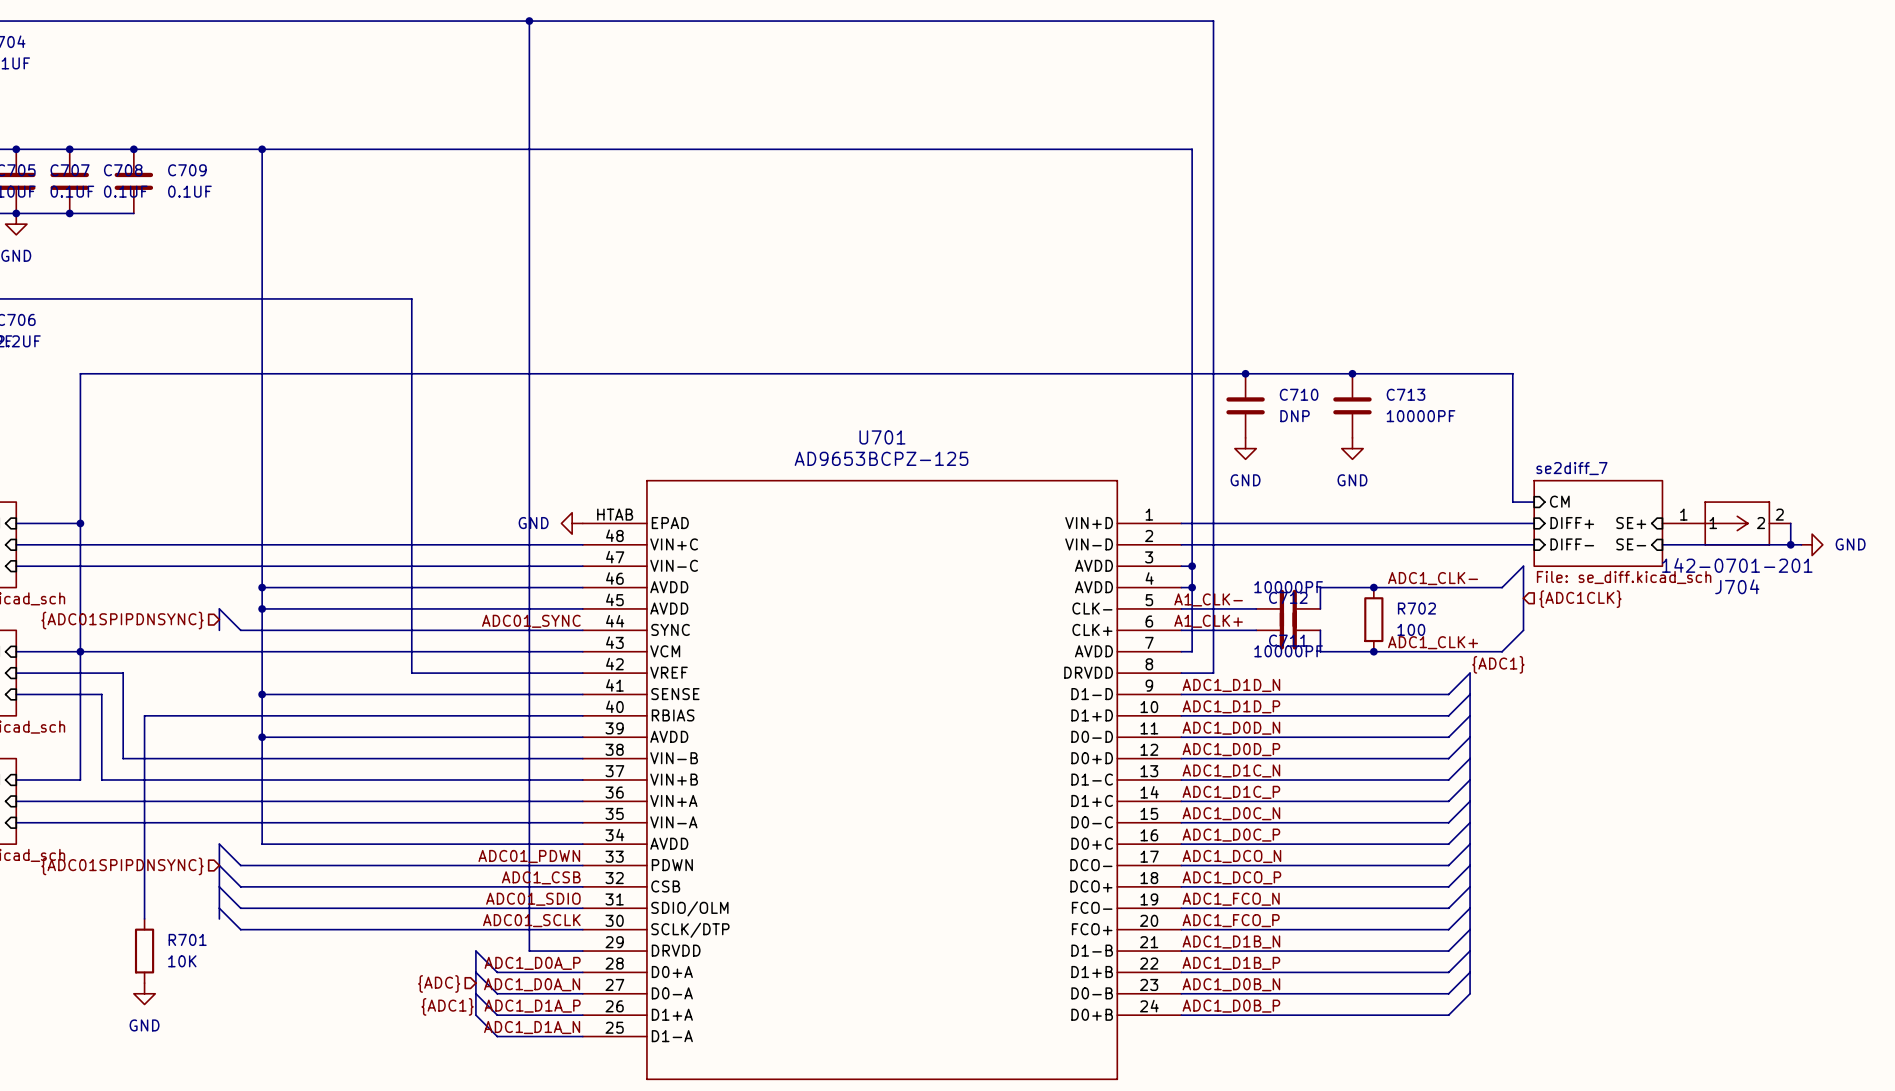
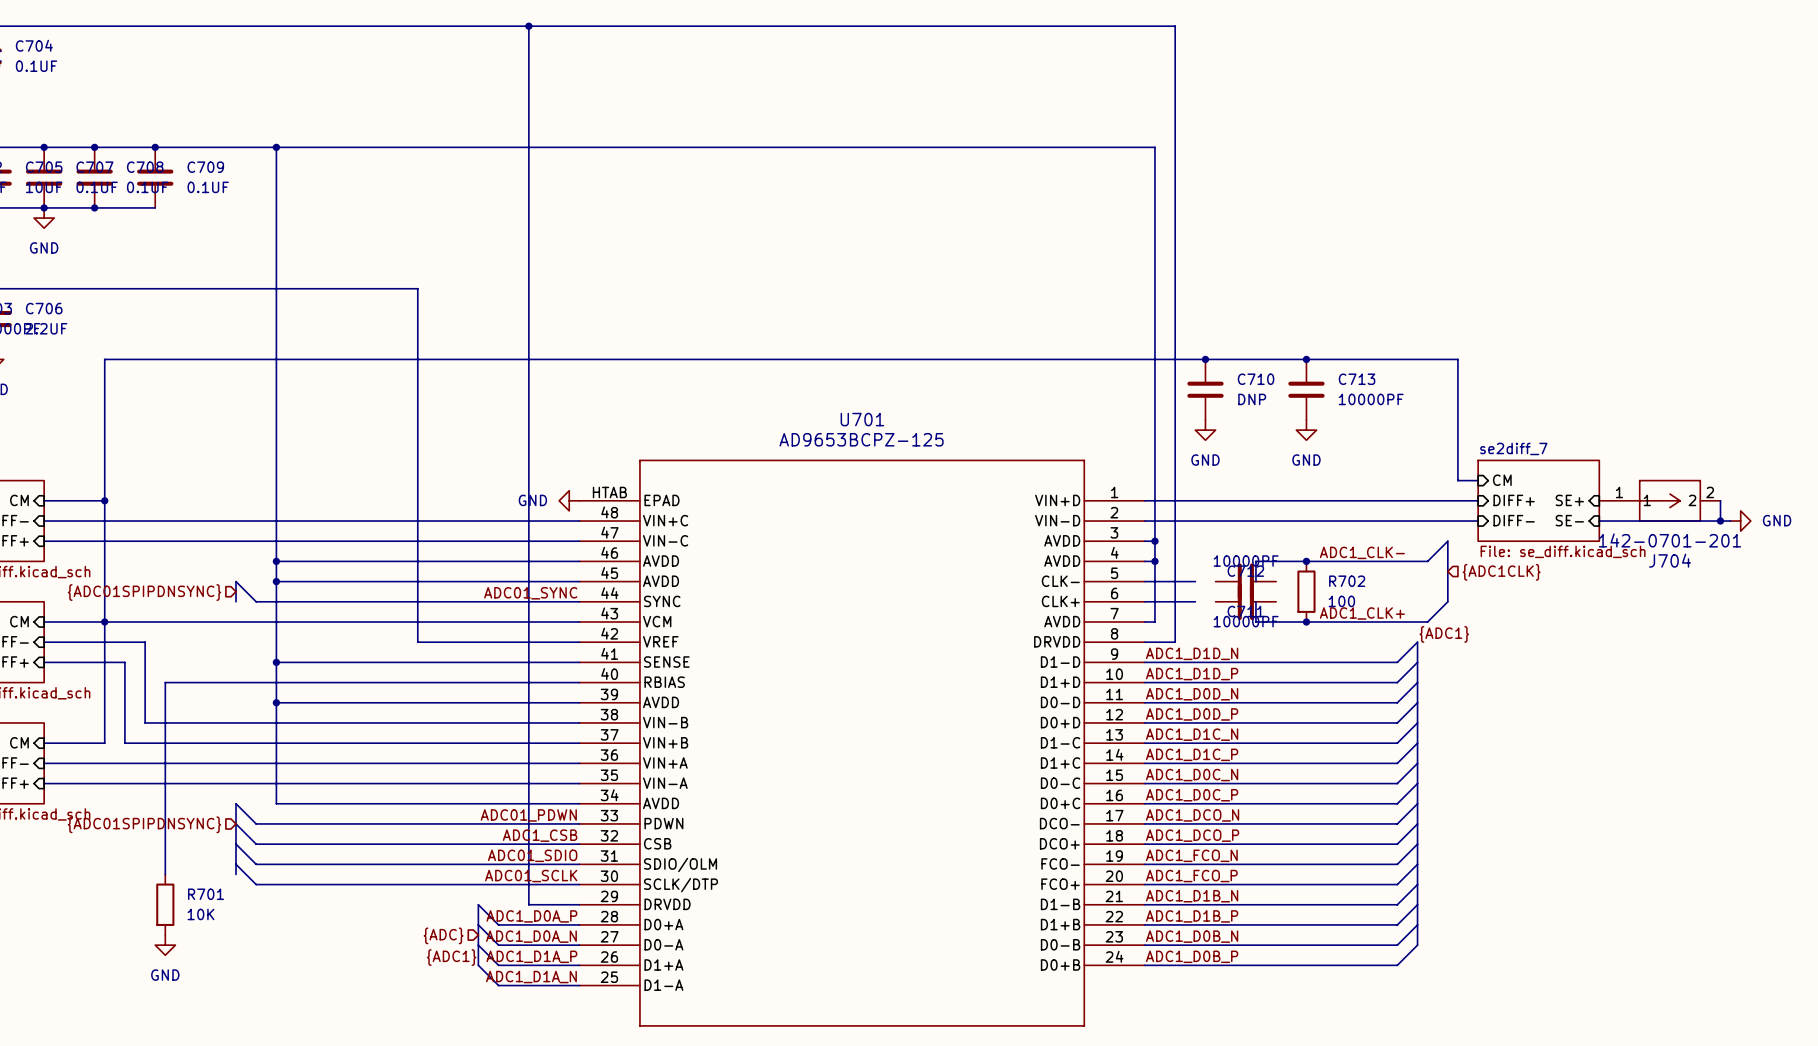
wire: (1523, 566) (1502, 587) (1480, 587) -> (1447, 541) (1427, 561)
bus: (1523, 566) (1523, 630) -> (1447, 541) (1447, 601)
label position: ADC1_CLK- (1433, 578) -> ADC1_CLK- (1362, 552)
wire: (1320, 587) (1320, 608) -> (1276, 561) (1255, 561) (1255, 581)
junction position: (1373, 587) -> (1306, 561)
label: A1_CLK- (1208, 599) -> none
hierarchical label position: {ADC1CLK} (1580, 599) -> {ADC1CLK} (1501, 572)
wire: (1234, 608) (1256, 608) -> none
R702 position: (1373, 619) -> (1306, 591)
label: A1_CLK+ (1208, 621) -> none
wire: (1234, 630) (1256, 630) -> none
wire: (1320, 630) (1320, 651) -> (1255, 601) (1255, 622) (1276, 622)
wire: (1523, 630) (1502, 651) (1480, 651) -> (1447, 601) (1427, 622)
label position: ADC1_CLK+ (1433, 642) -> ADC1_CLK+ (1362, 613)
junction position: (1373, 651) -> (1306, 622)

